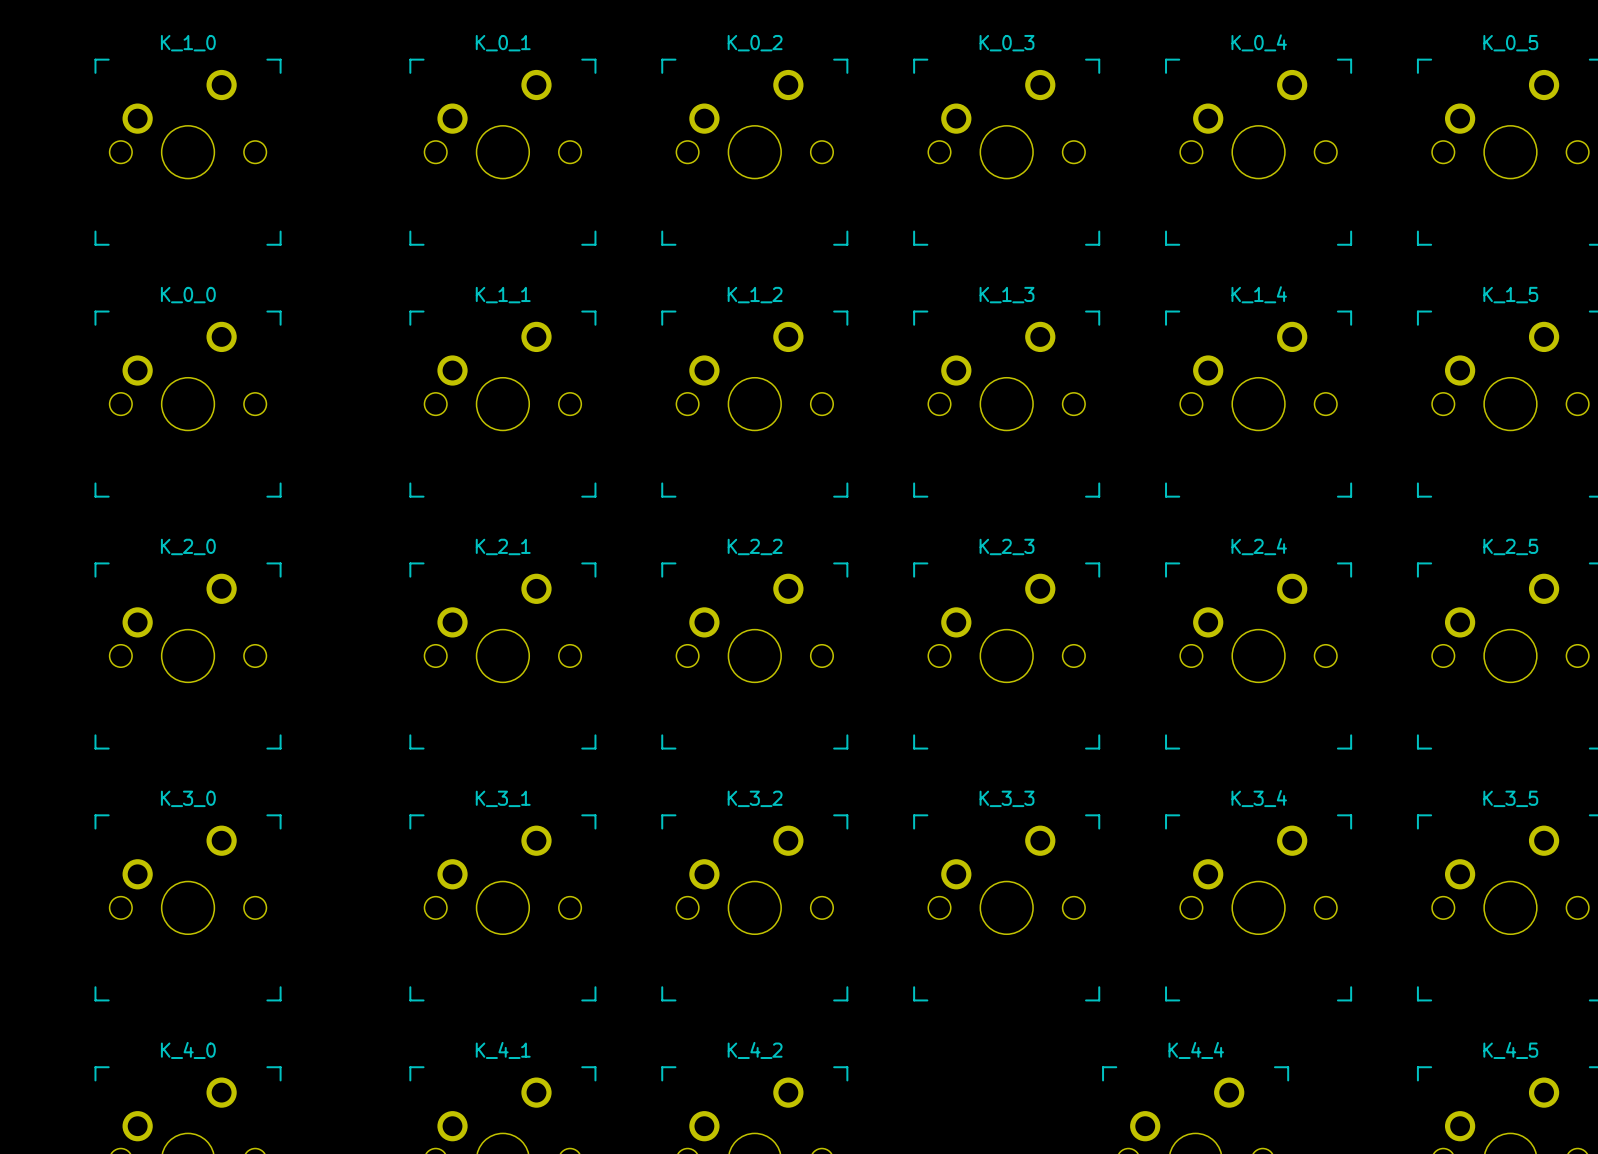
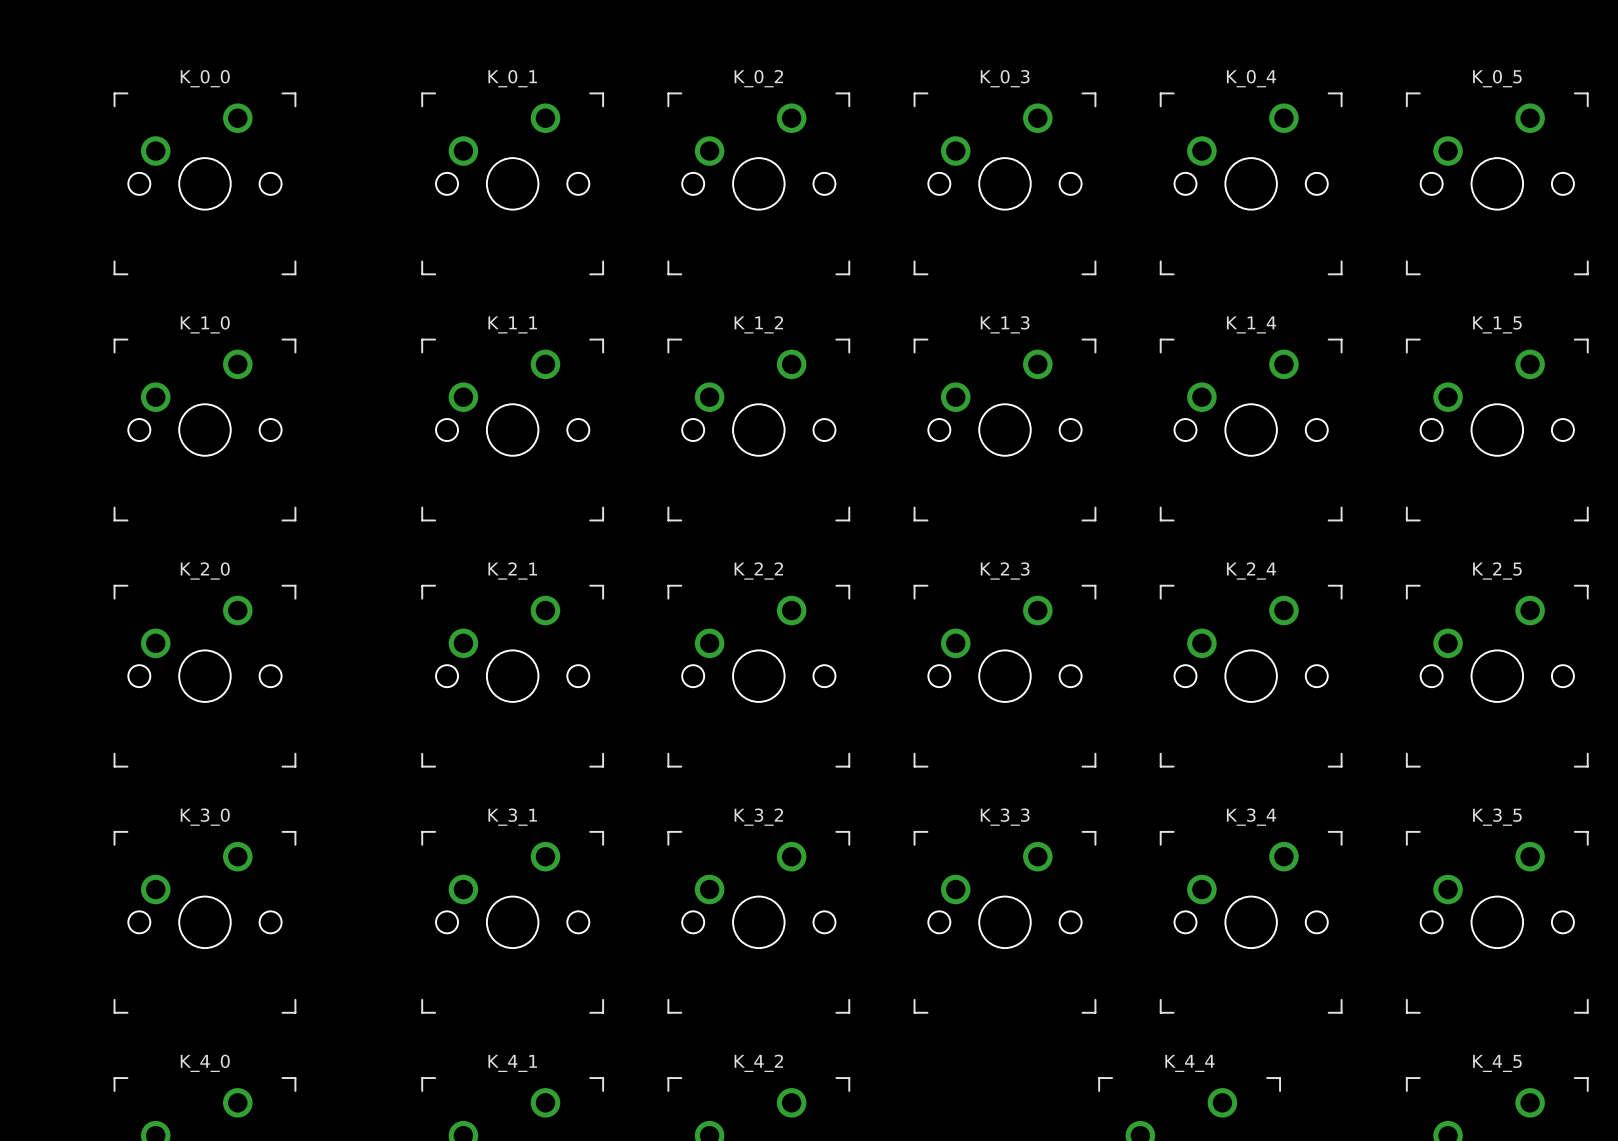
K_1_0 name: K_1_0 (188, 43) -> K_0_0 (205, 78)
K_0_0 name: K_0_0 (188, 295) -> K_1_0 (205, 324)

